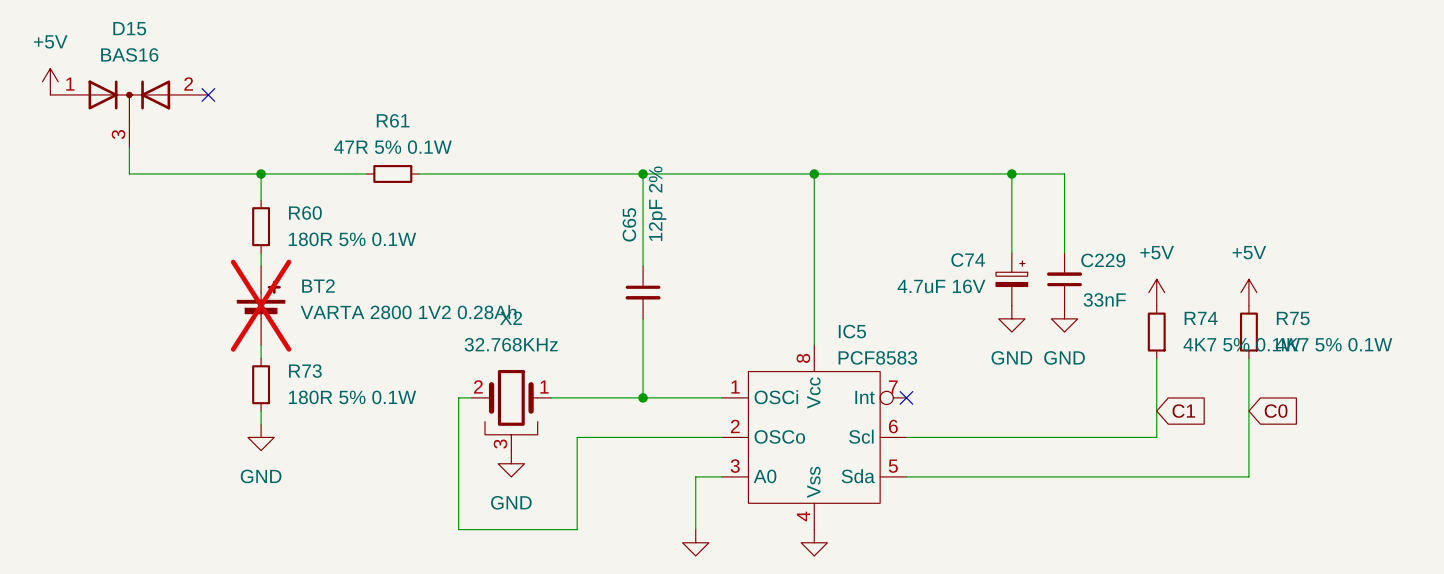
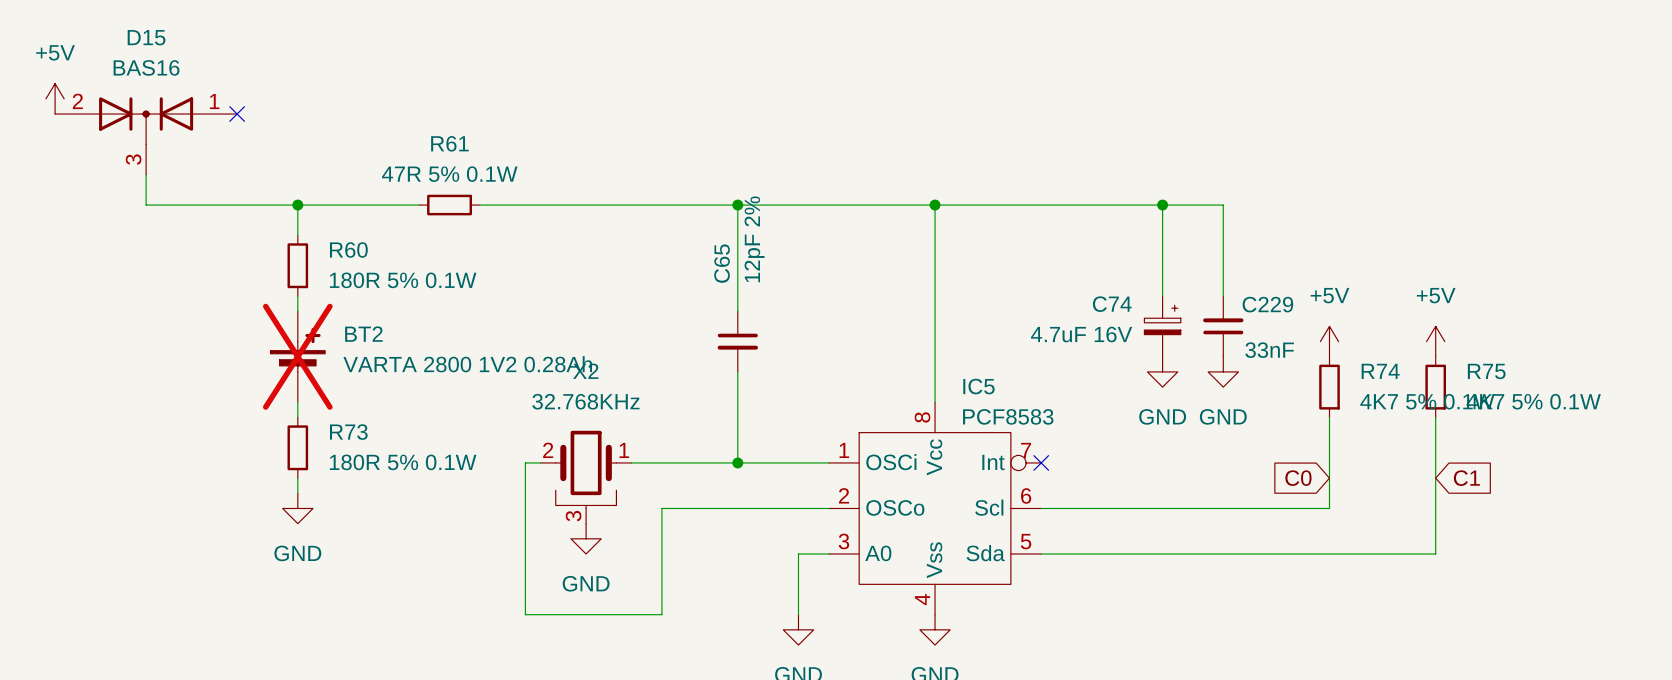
D15 flip: as is (129, 100) -> left-right (146, 120)
global label: C1 (1183, 411) -> C0 (1298, 478)
global label: C0 (1276, 411) -> C1 (1466, 478)

